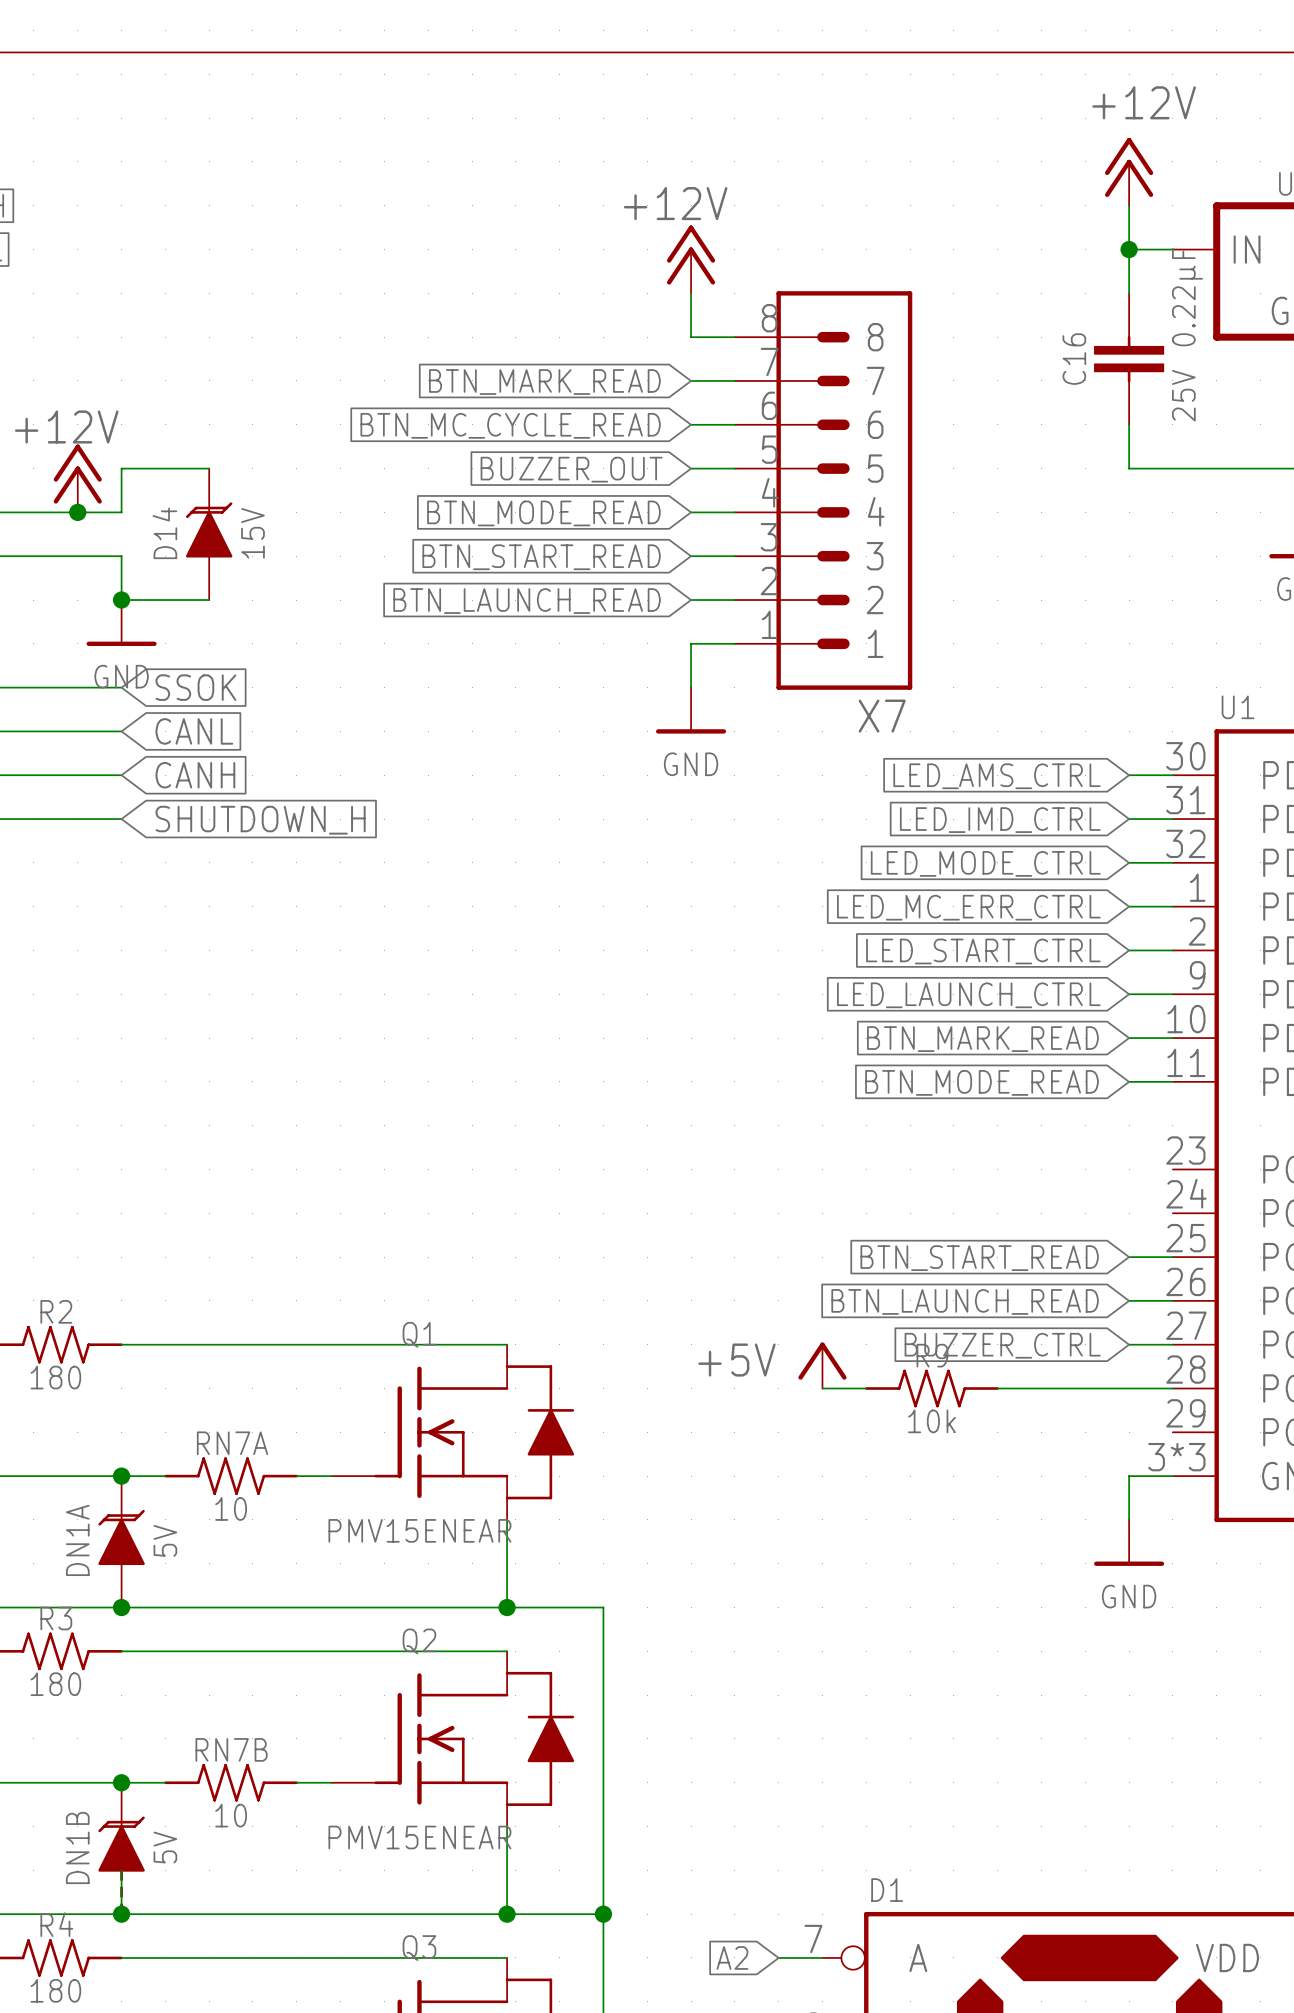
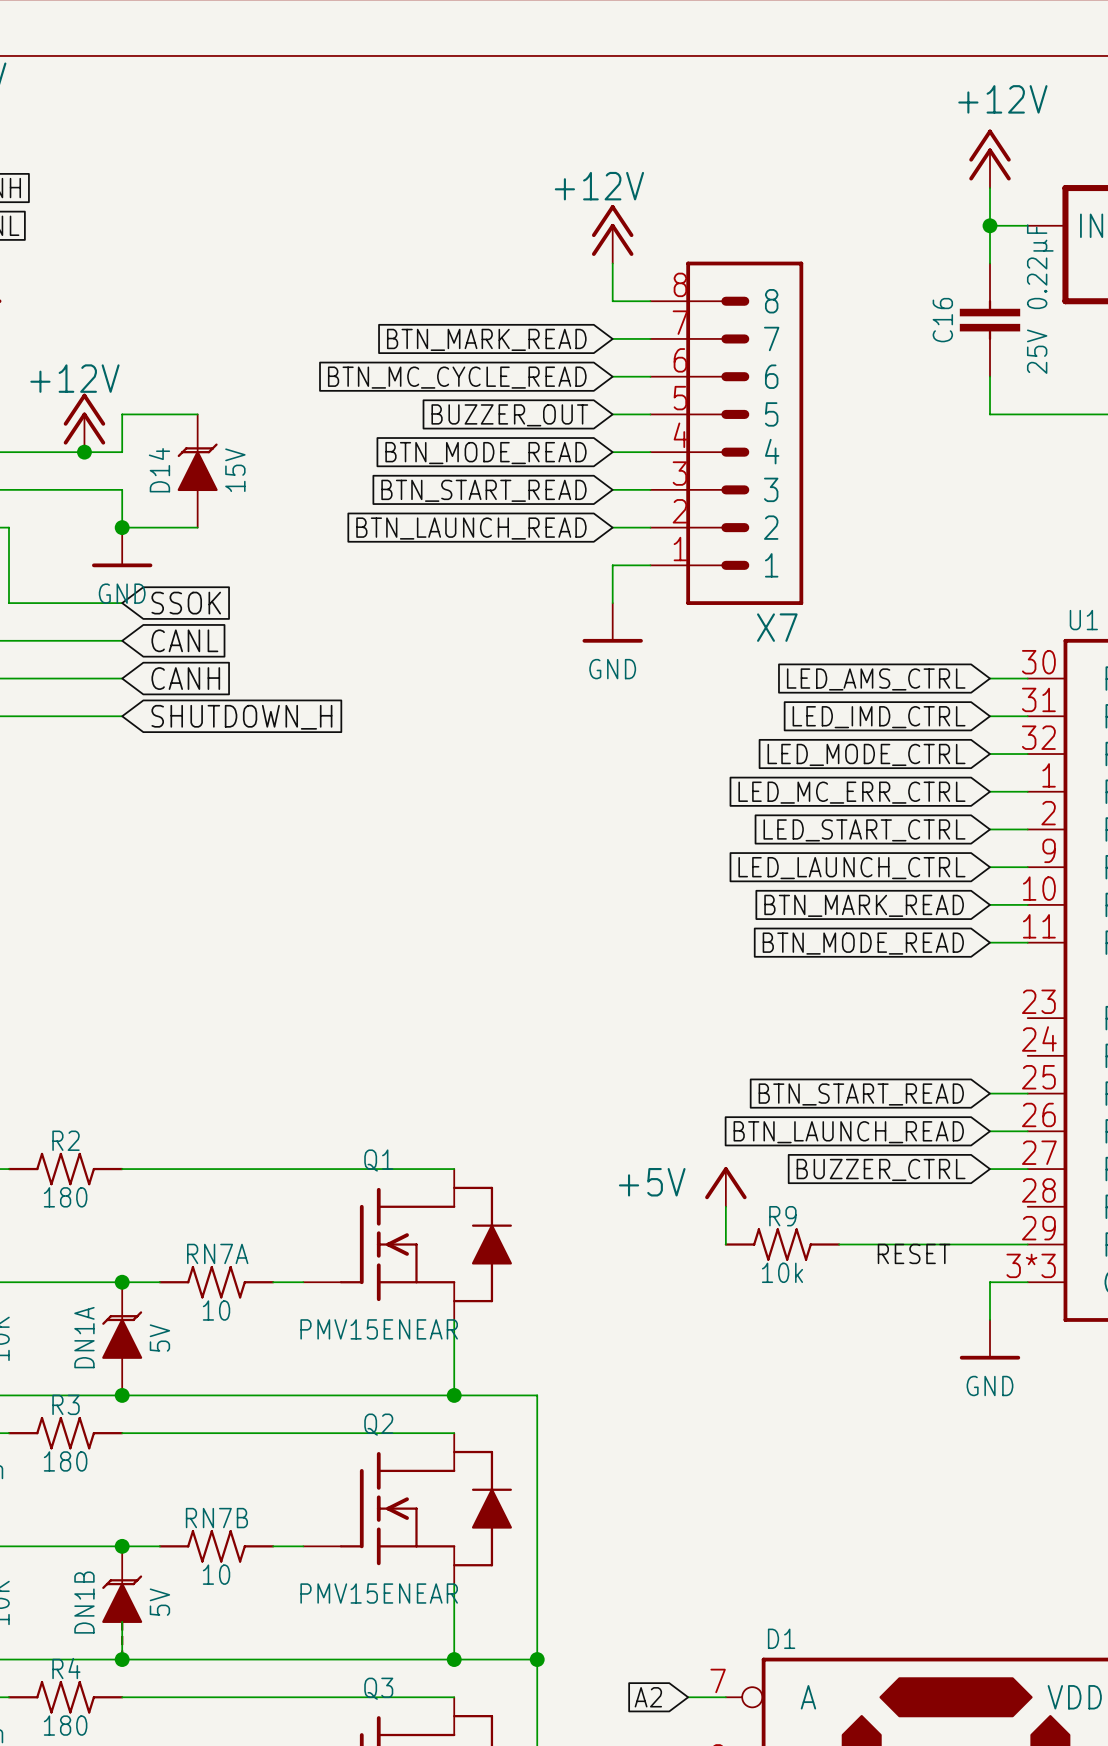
wire: (822, 1388) (866, 1388) -> (725, 1206) (725, 1244)
R9 position: (931, 1388) -> (782, 1244)
wire: (997, 1388) (1172, 1388) -> none
wire: none -> (839, 1244) (1027, 1244)
label: none -> RESET (914, 1253)

